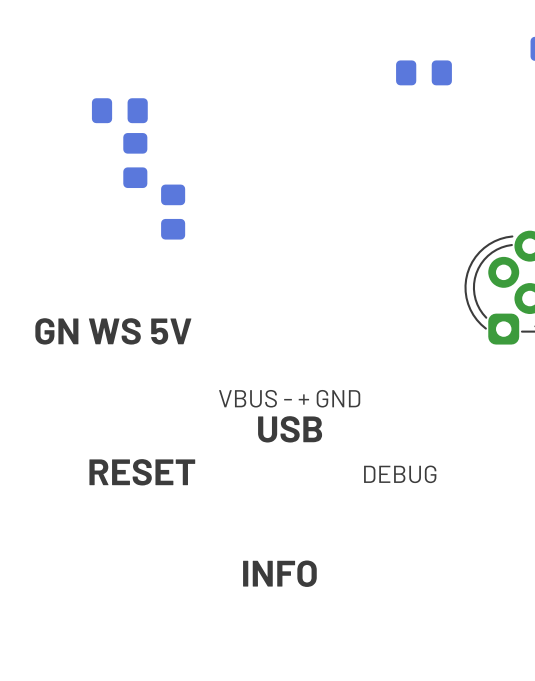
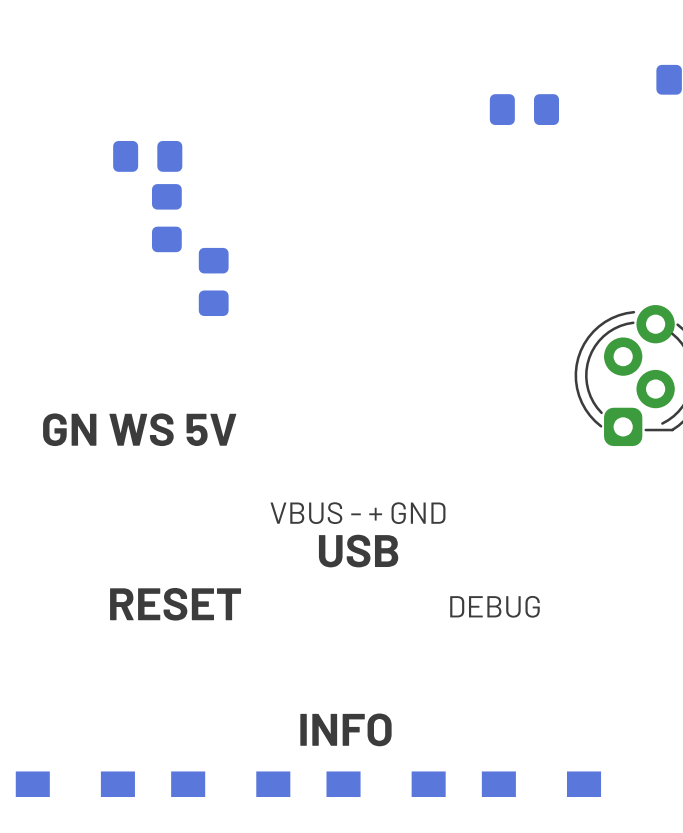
part: none -> (75, 784)
part: none -> (230, 784)
part: none -> (386, 784)
part: none -> (541, 784)

